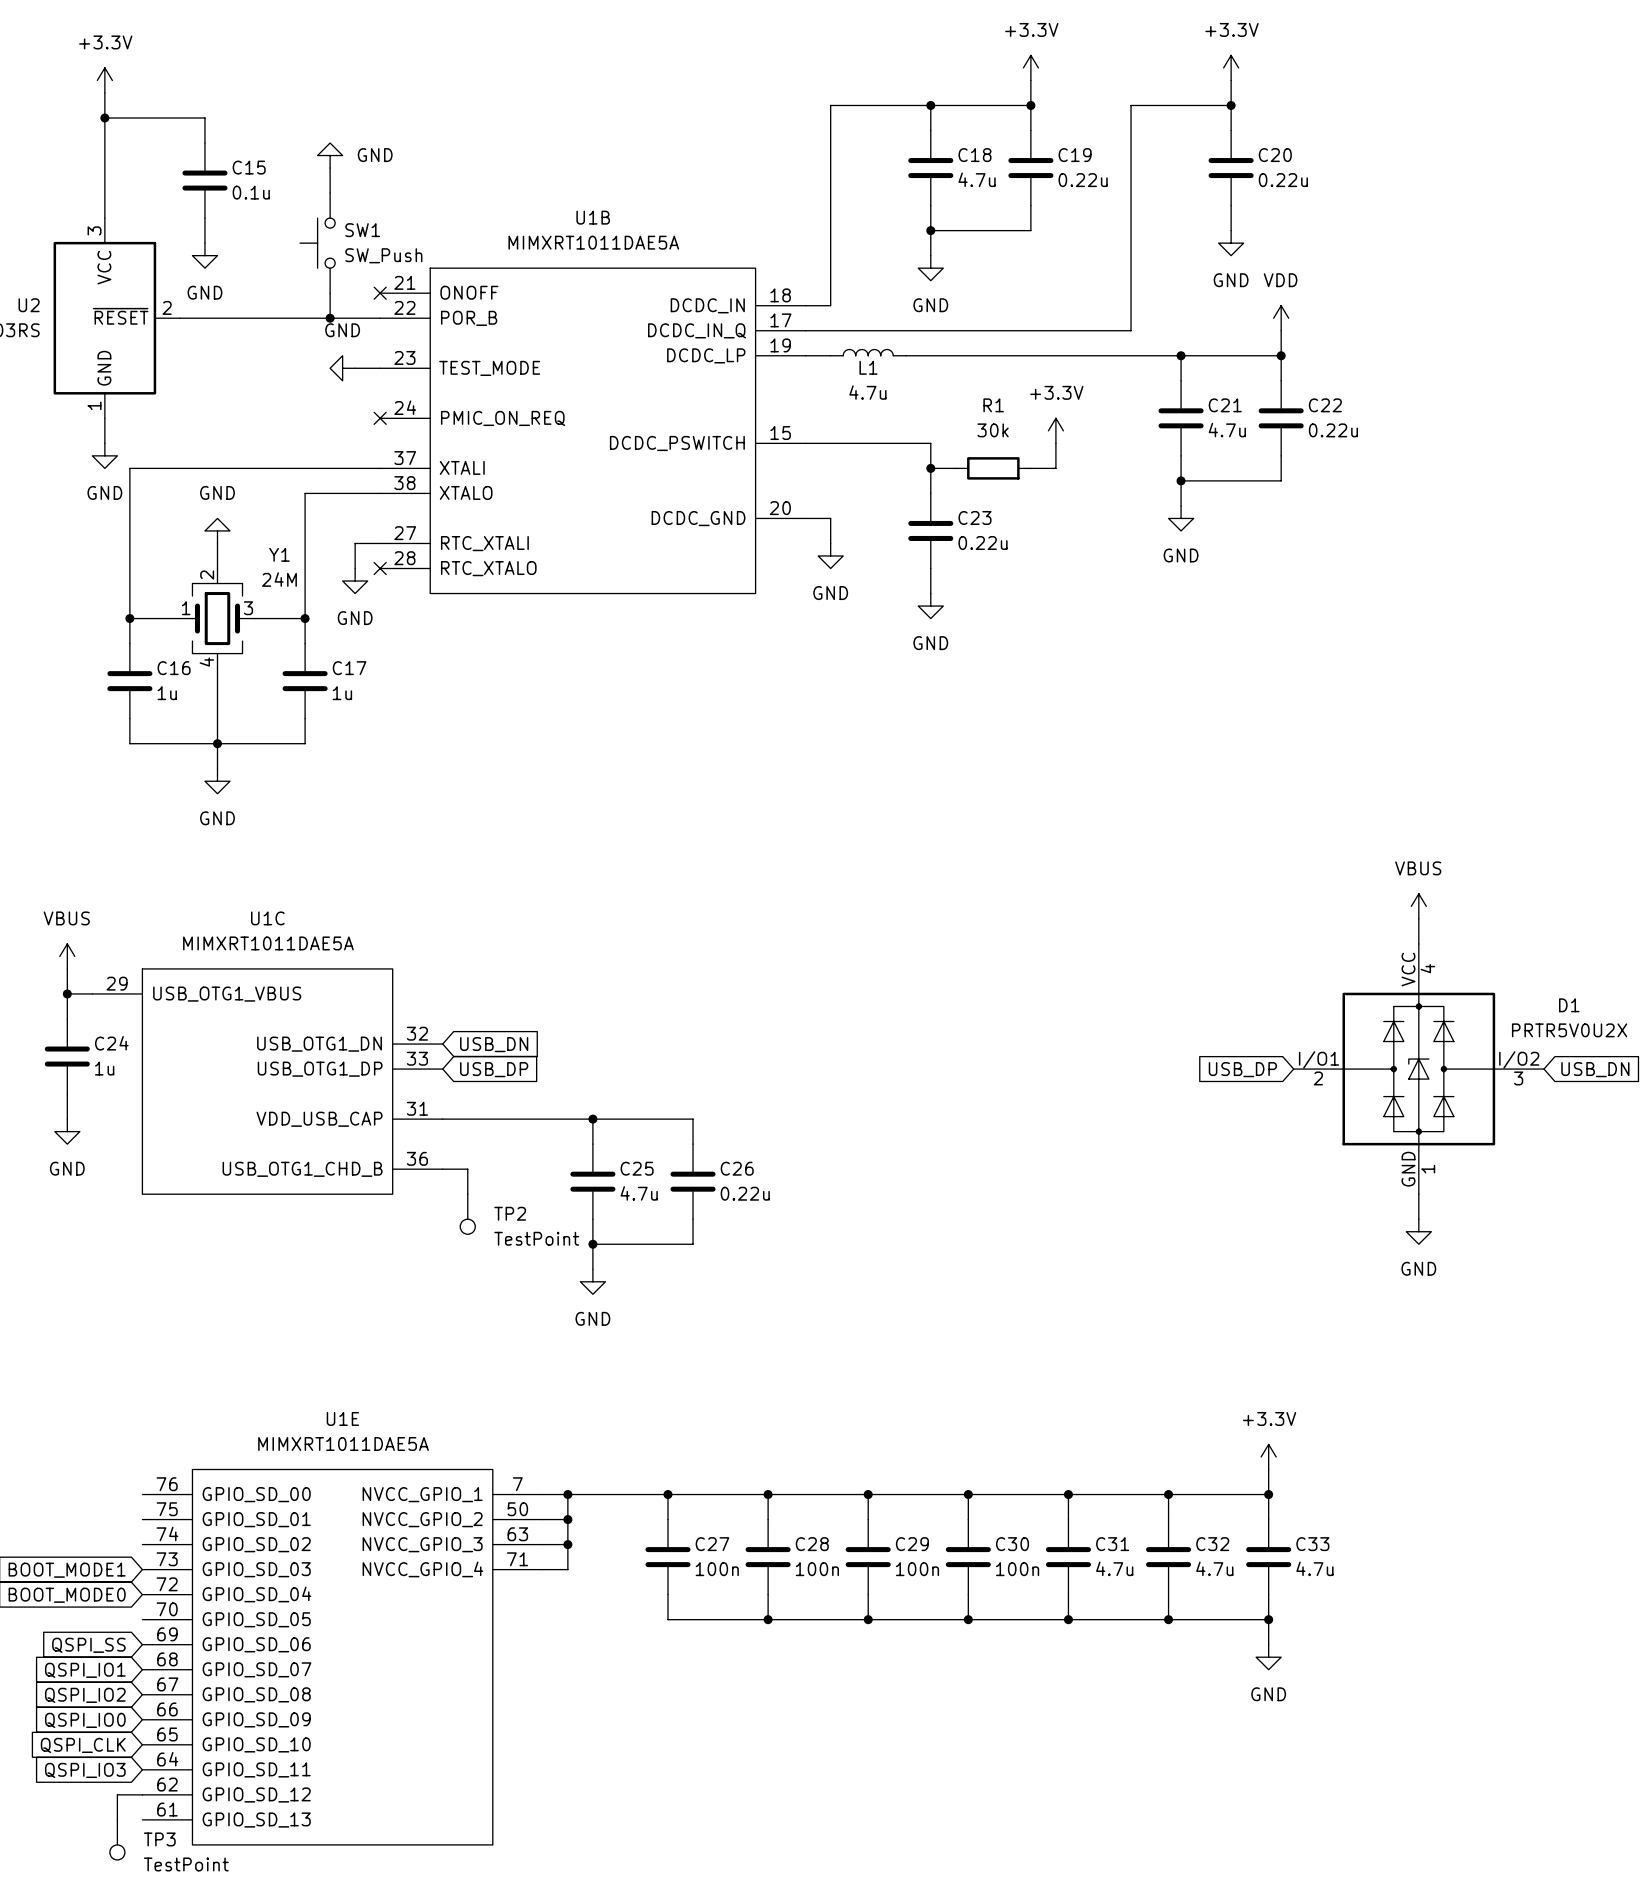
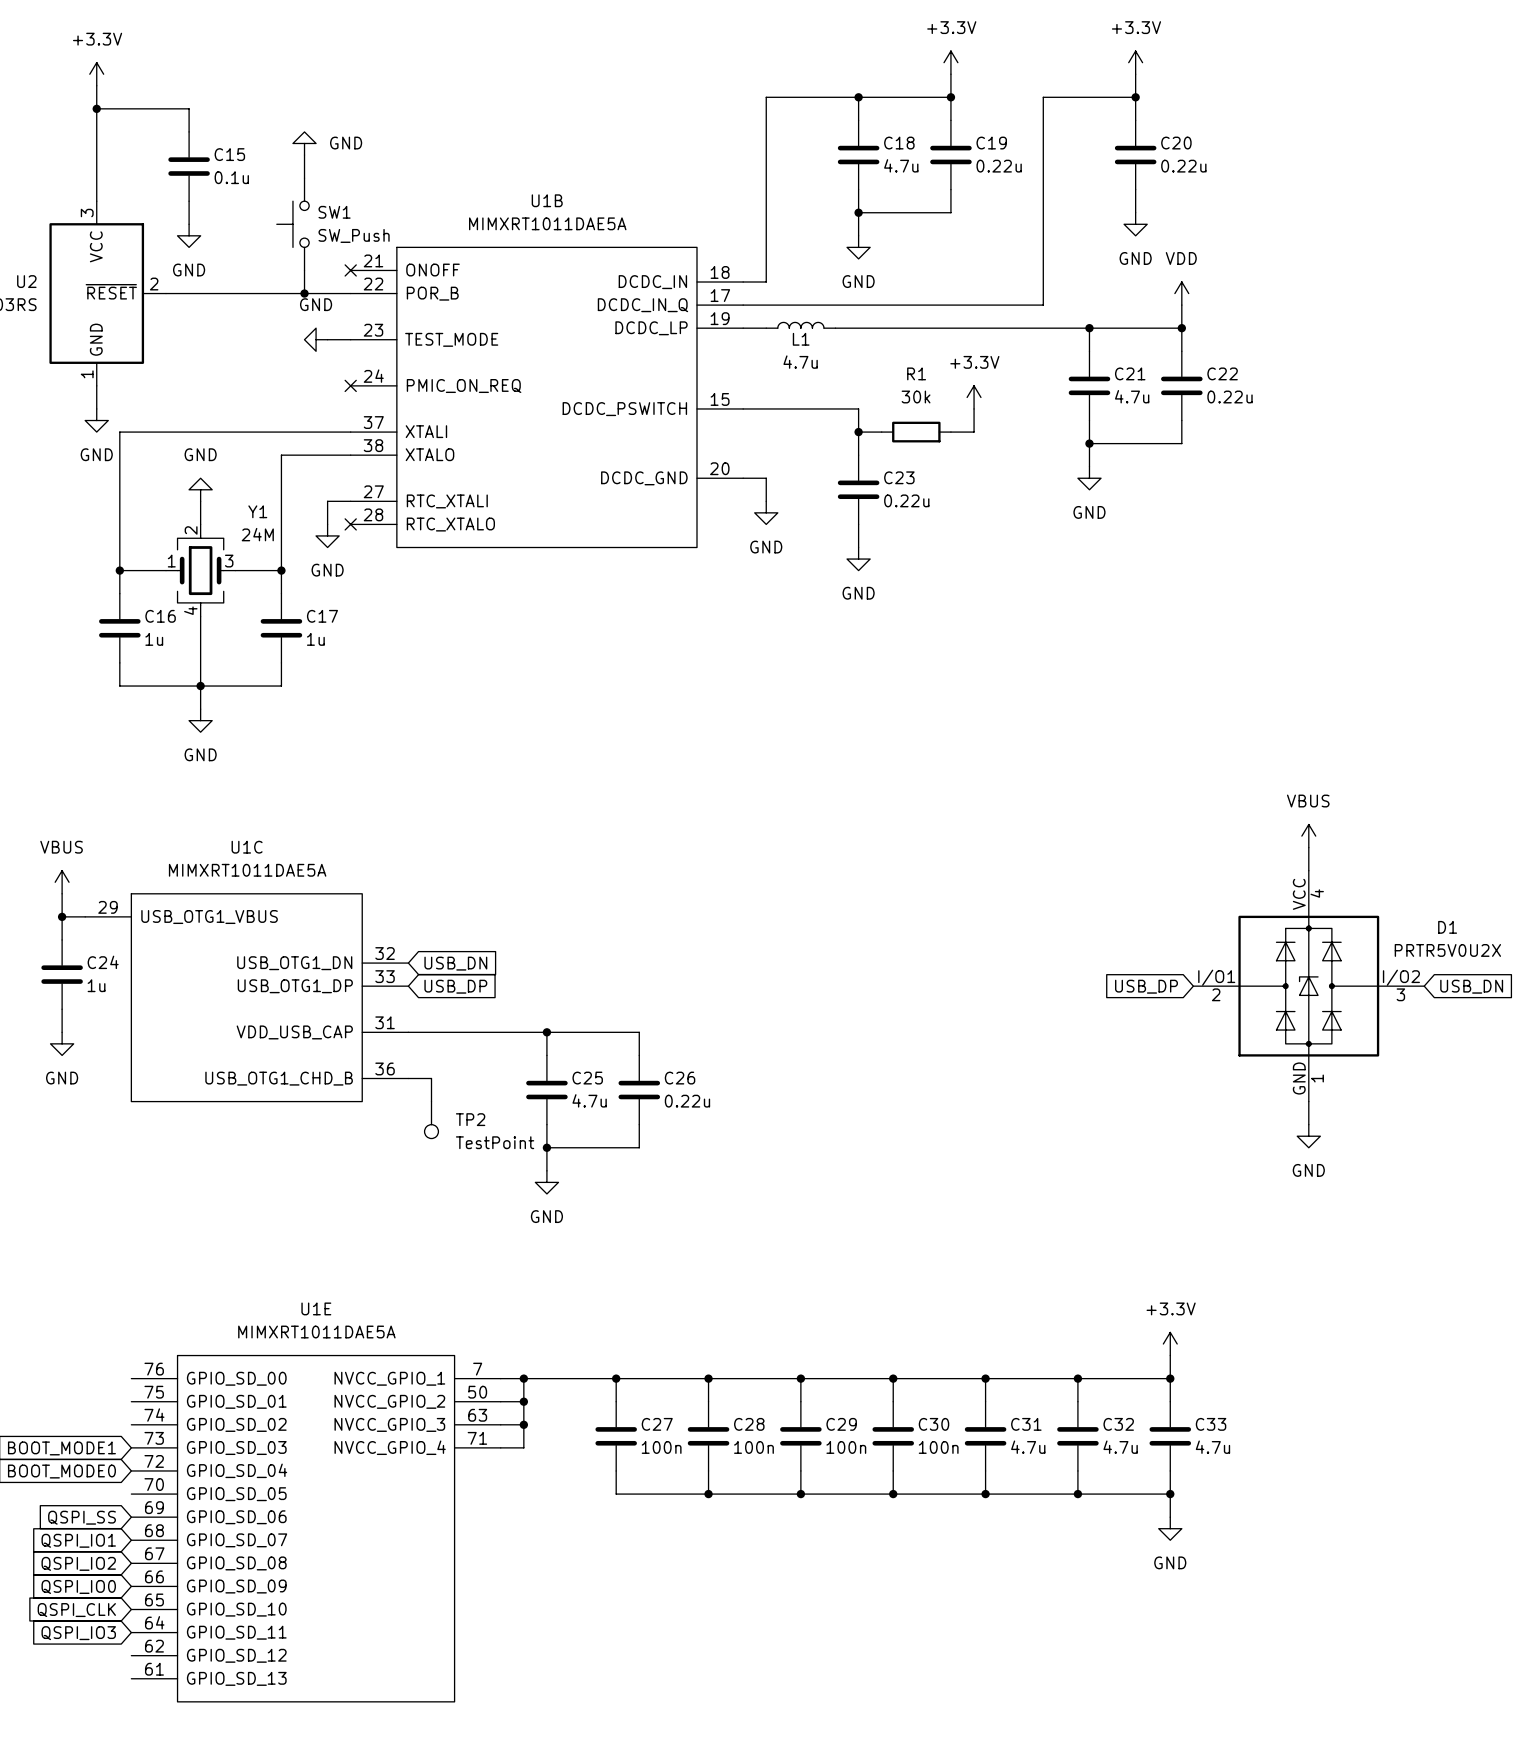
wire: (142, 1794) (117, 1794) (117, 1819) -> none
TP3: TestPoint (117, 1839) -> none

